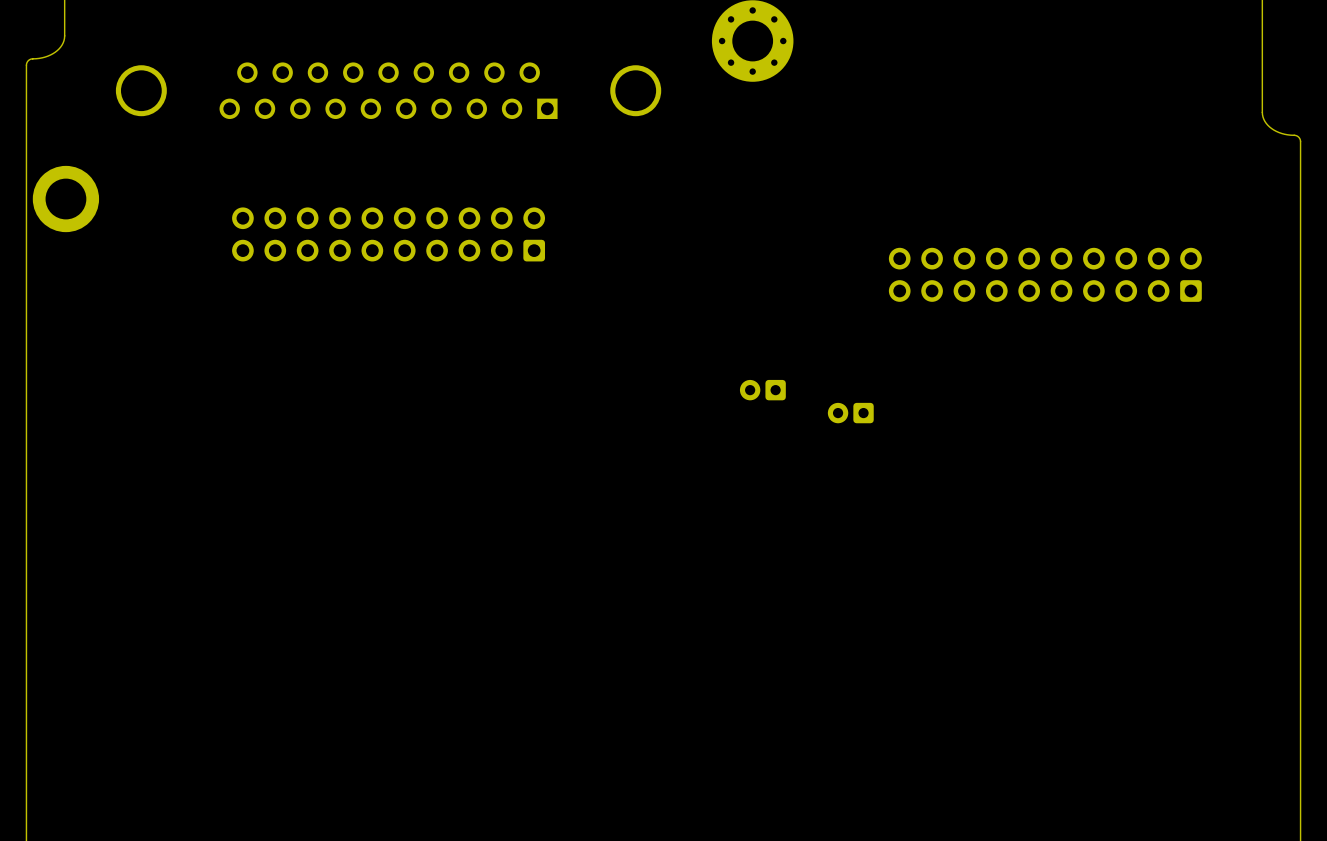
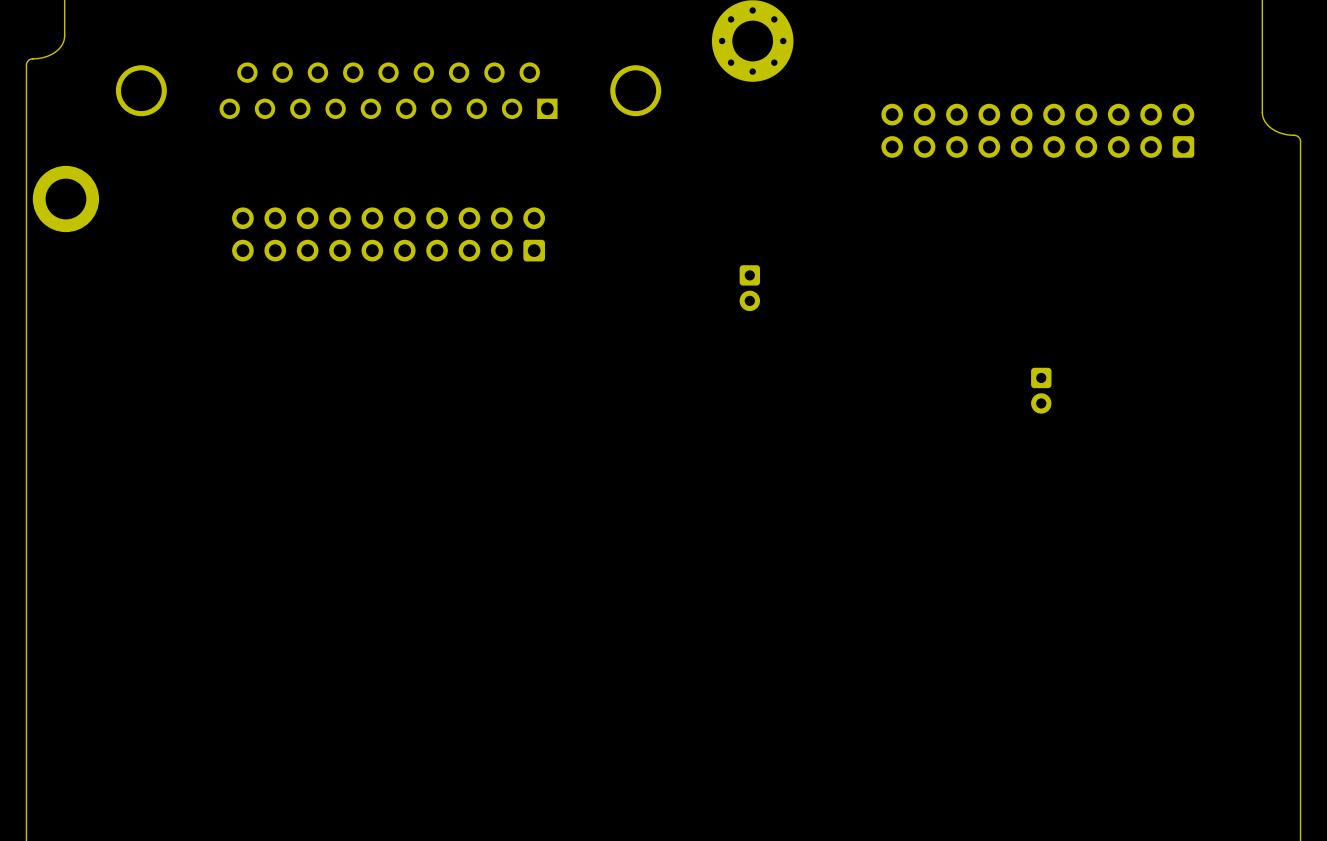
part position: (1045, 274) -> (1037, 130)
part: none -> (749, 288)
part: (762, 390) -> none
part: none -> (1041, 390)
part: (850, 413) -> none

